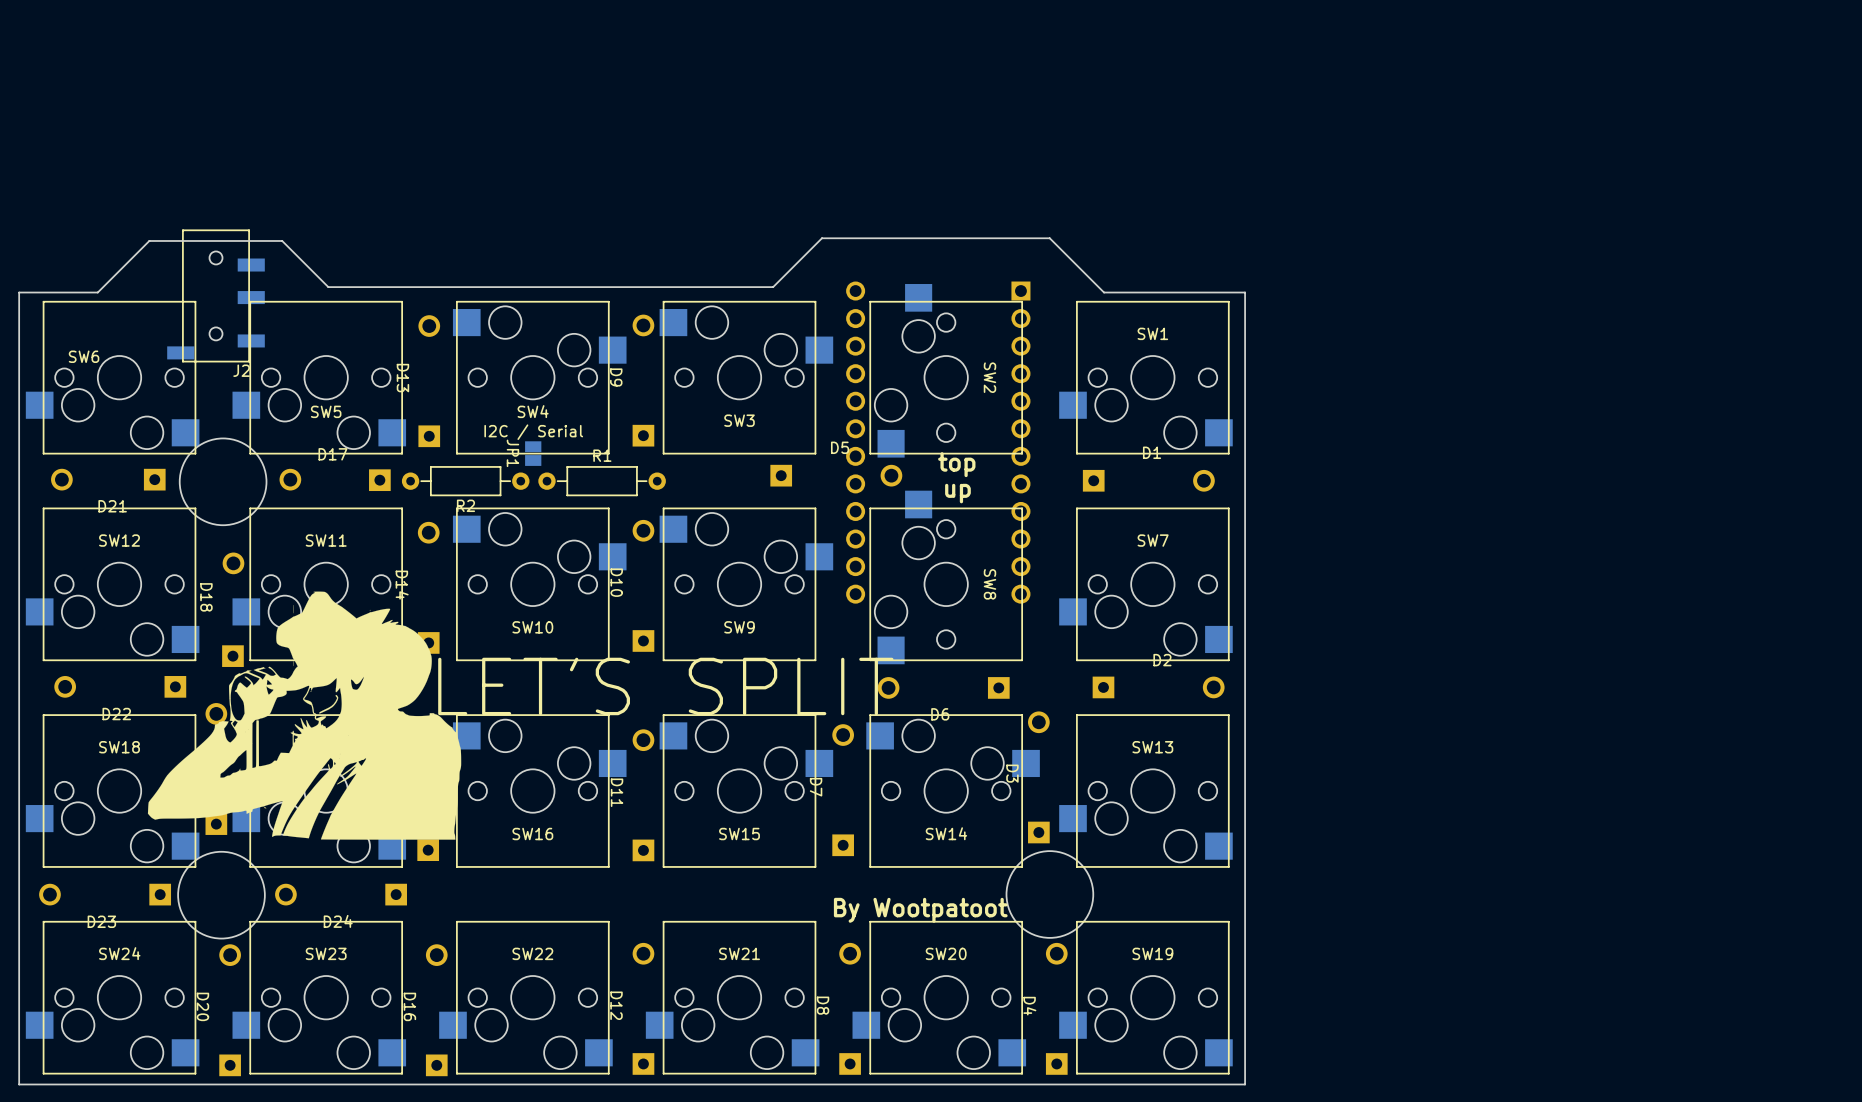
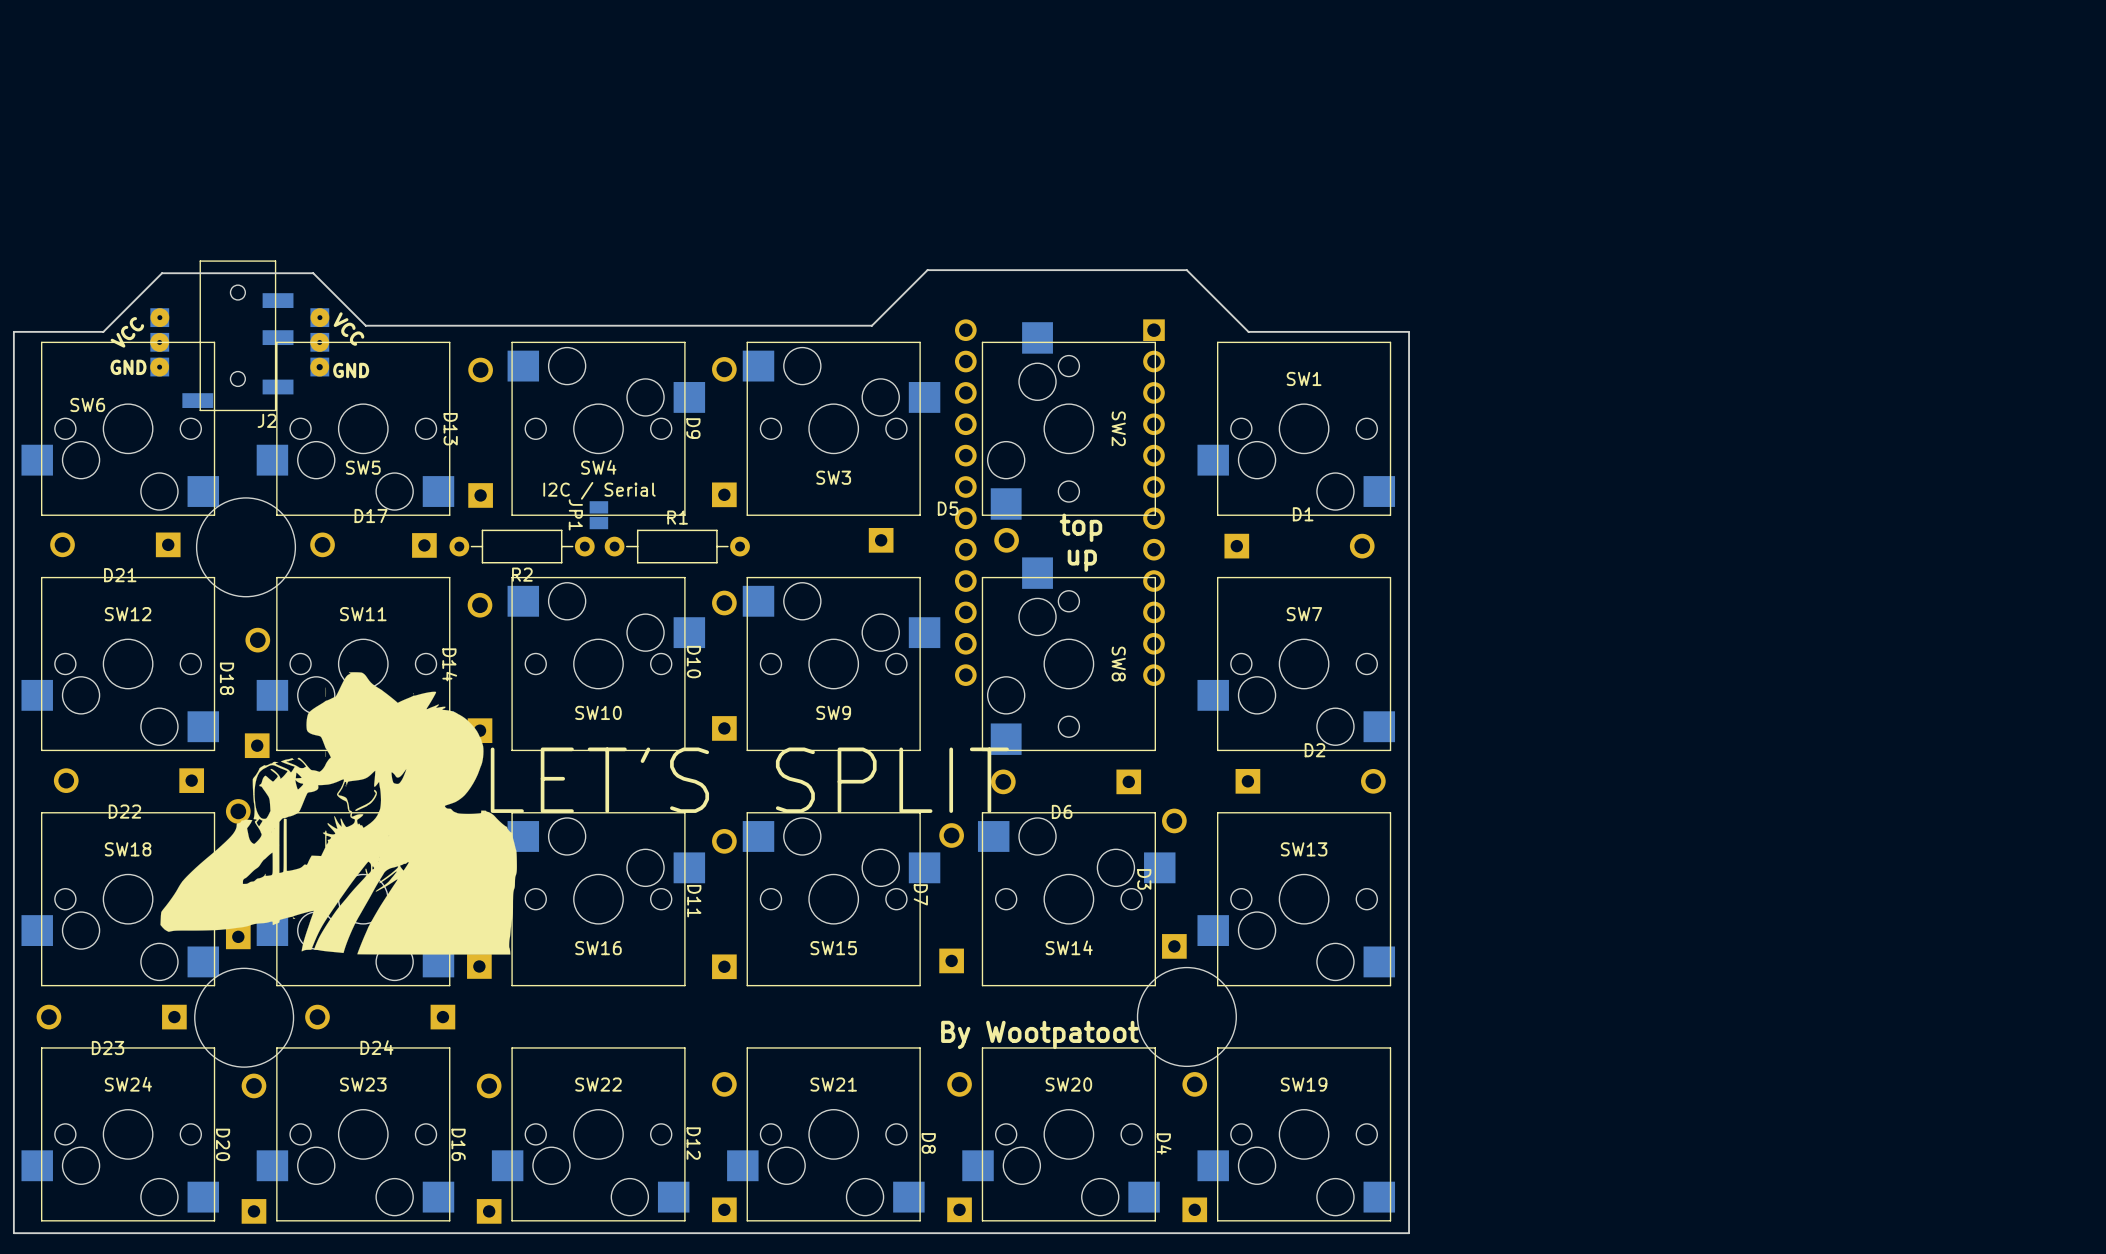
text: none -> VCC (348, 329)
text: none -> VCC (127, 332)
part: none -> (159, 342)
part: none -> (319, 342)
text: none -> GND (128, 367)
text: none -> GND (351, 370)

